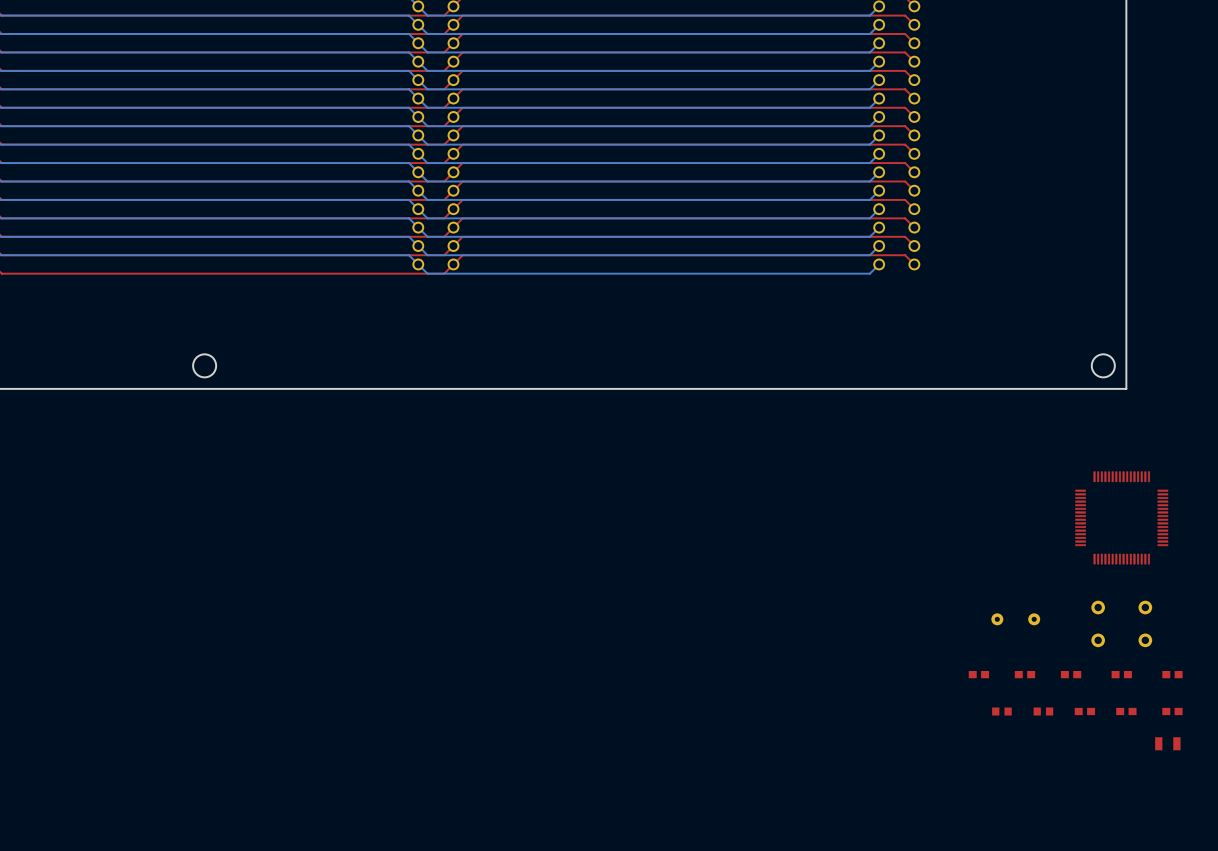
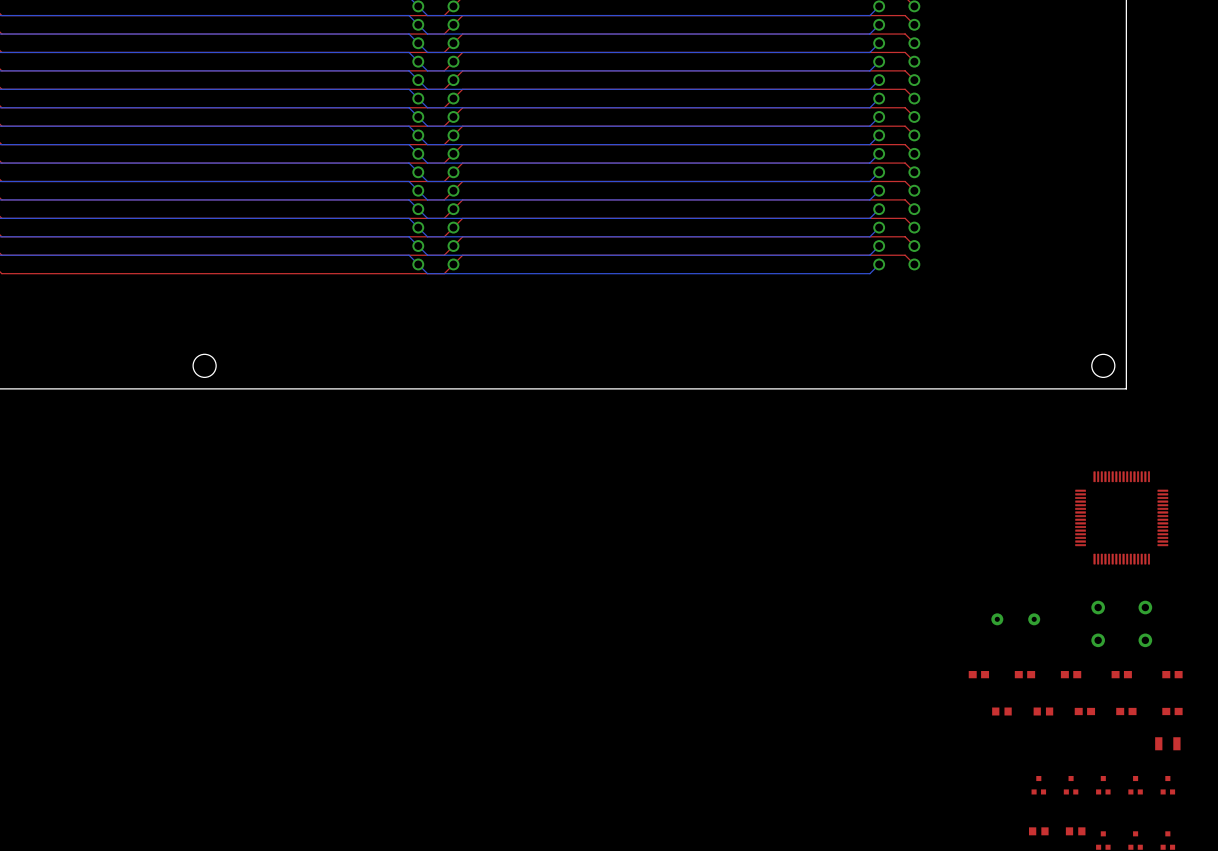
part: none -> (1038, 785)
part: none -> (1071, 785)
part: none -> (1103, 785)
part: none -> (1135, 785)
part: none -> (1167, 785)
part: none -> (1038, 831)
part: none -> (1075, 831)
part: none -> (1103, 840)
part: none -> (1135, 840)
part: none -> (1167, 840)

